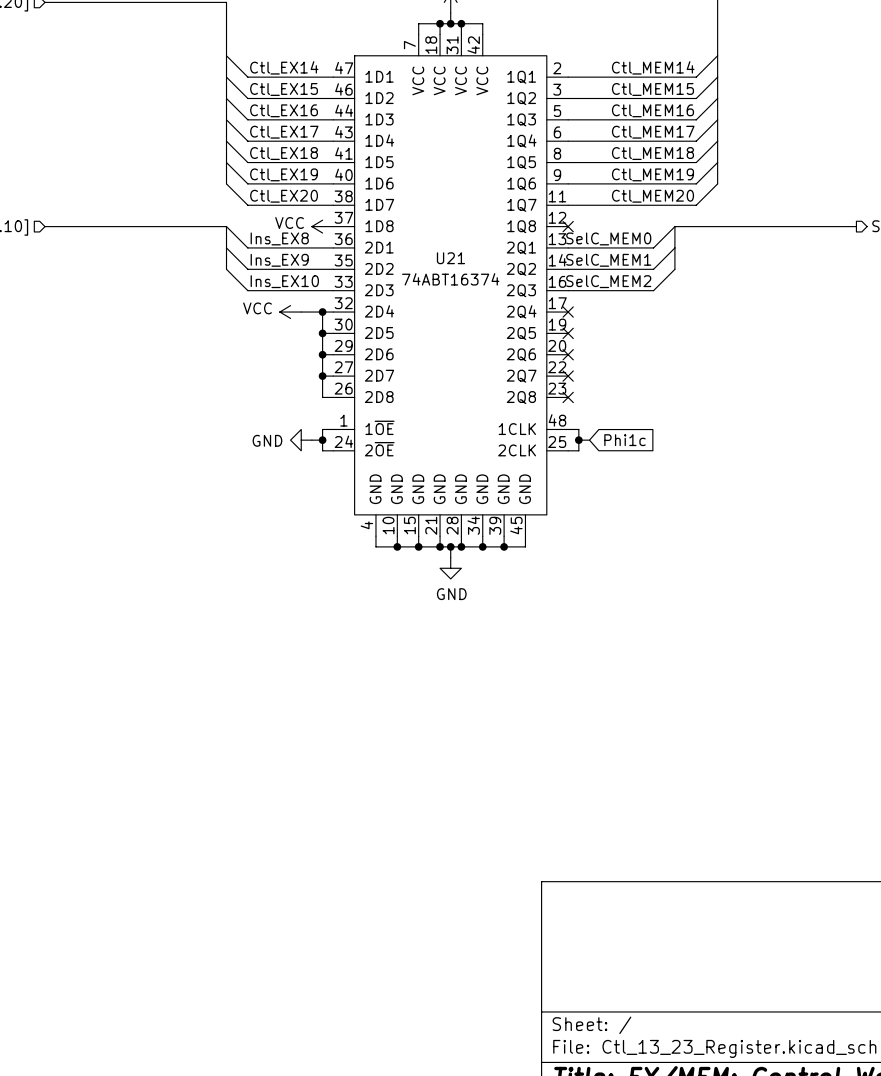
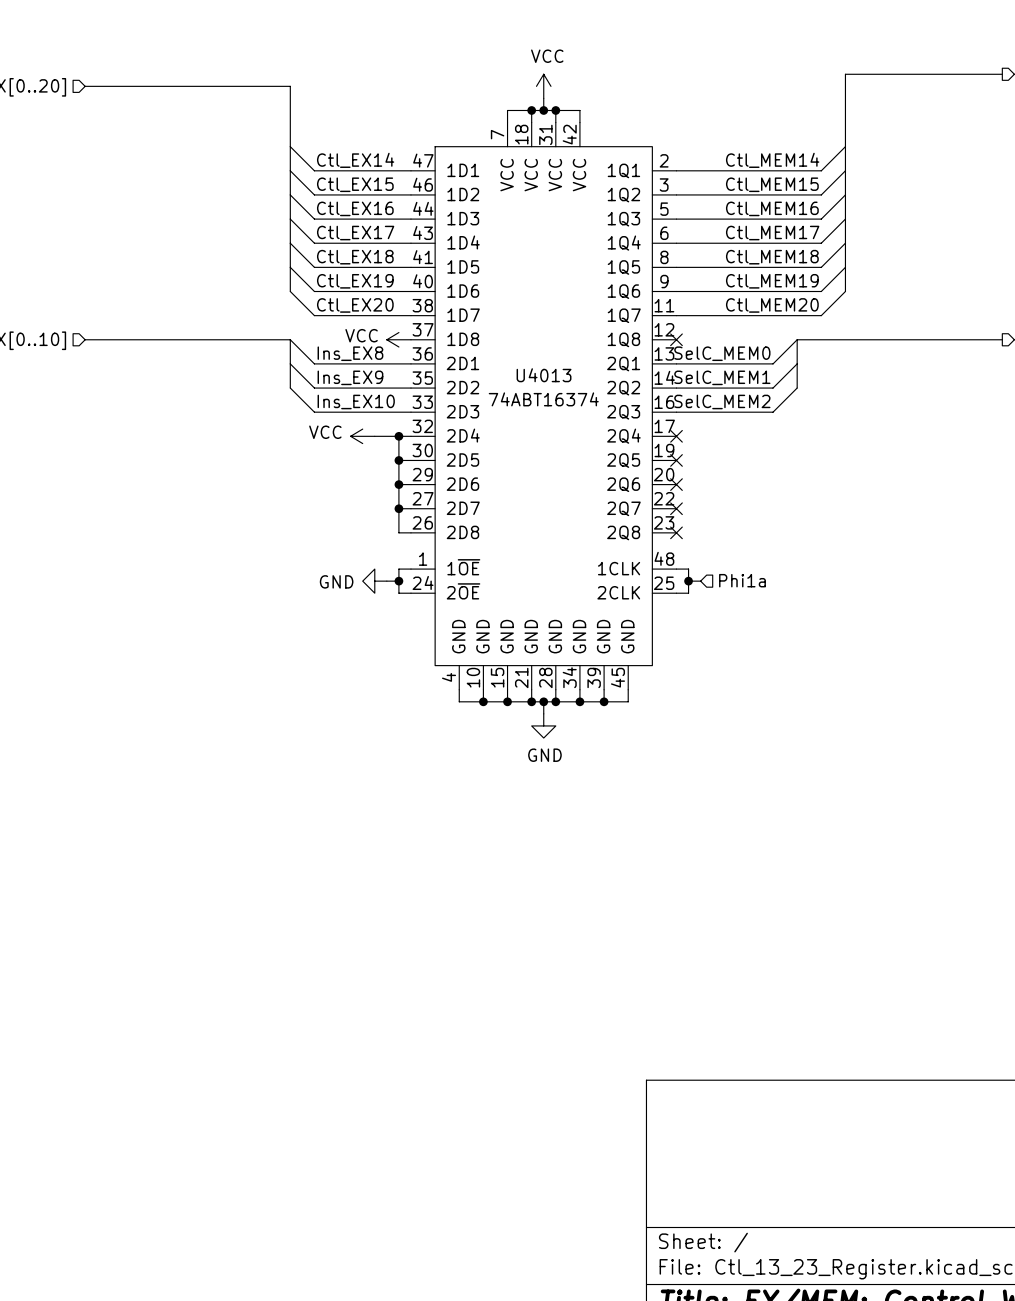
U21 name: U21 (450, 258) -> U4013 (544, 375)
hierarchical label: none -> Phi1a (742, 580)
global label: Phi1c (624, 440) -> none

